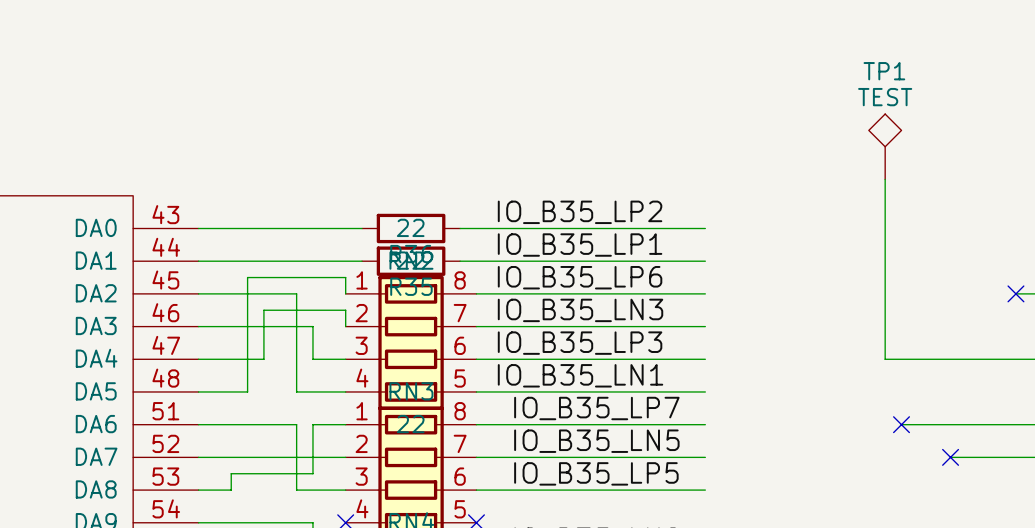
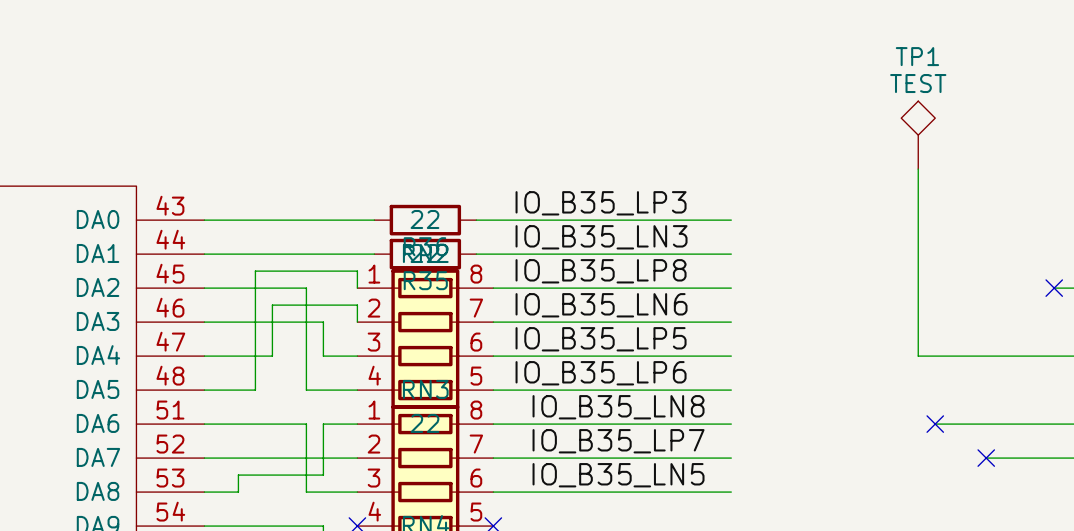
label: IO_B35_LP2 (580, 212) -> IO_B35_LP3 (601, 203)
label: IO_B35_LP1 (580, 245) -> IO_B35_LN3 (601, 237)
label: IO_B35_LP6 (580, 277) -> IO_B35_LP8 (601, 271)
label: IO_B35_LN3 (580, 310) -> IO_B35_LN6 (601, 305)
label: IO_B35_LP3 (580, 343) -> IO_B35_LP5 (601, 339)
label: IO_B35_LN1 (580, 375) -> IO_B35_LP6 (601, 373)
label: IO_B35_LP7 (596, 408) -> IO_B35_LN8 (618, 407)
label: IO_B35_LN5 (596, 441) -> IO_B35_LP7 (618, 441)
label: IO_B35_LP5 (596, 473) -> IO_B35_LN5 (618, 475)

